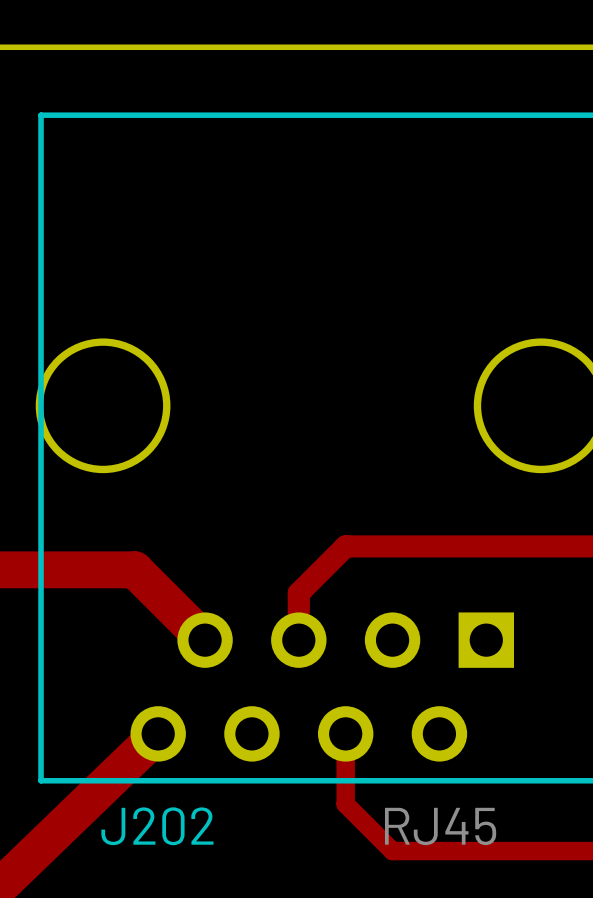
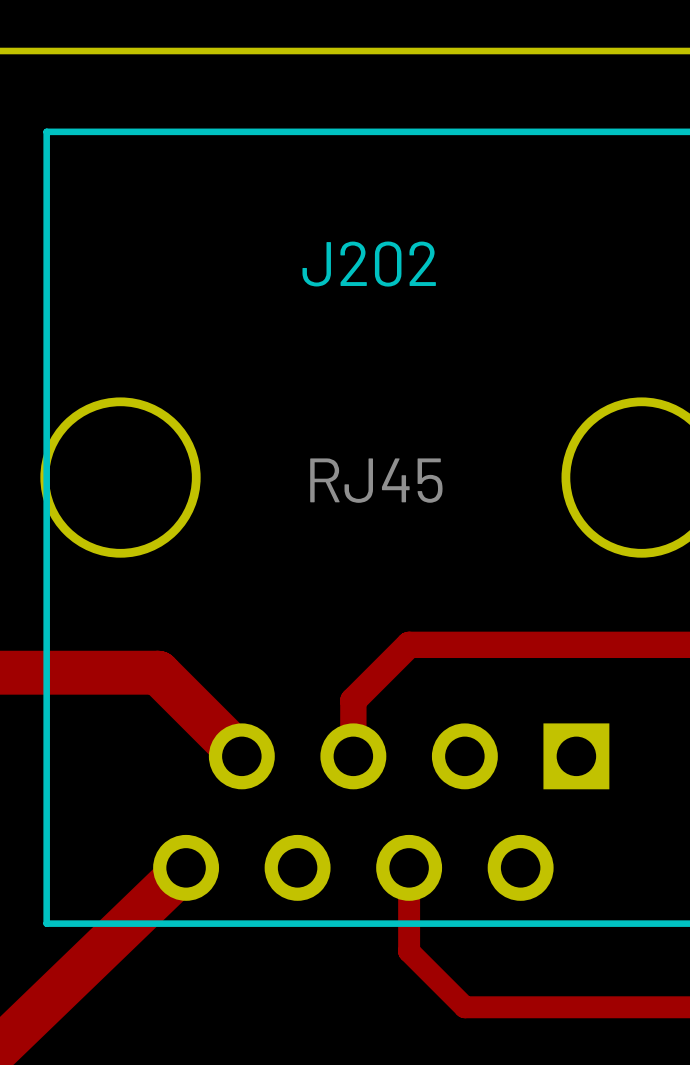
J202 name position: J202 (157, 826) -> J202 (369, 264)
J202 value position: RJ45 (440, 826) -> RJ45 (376, 480)

